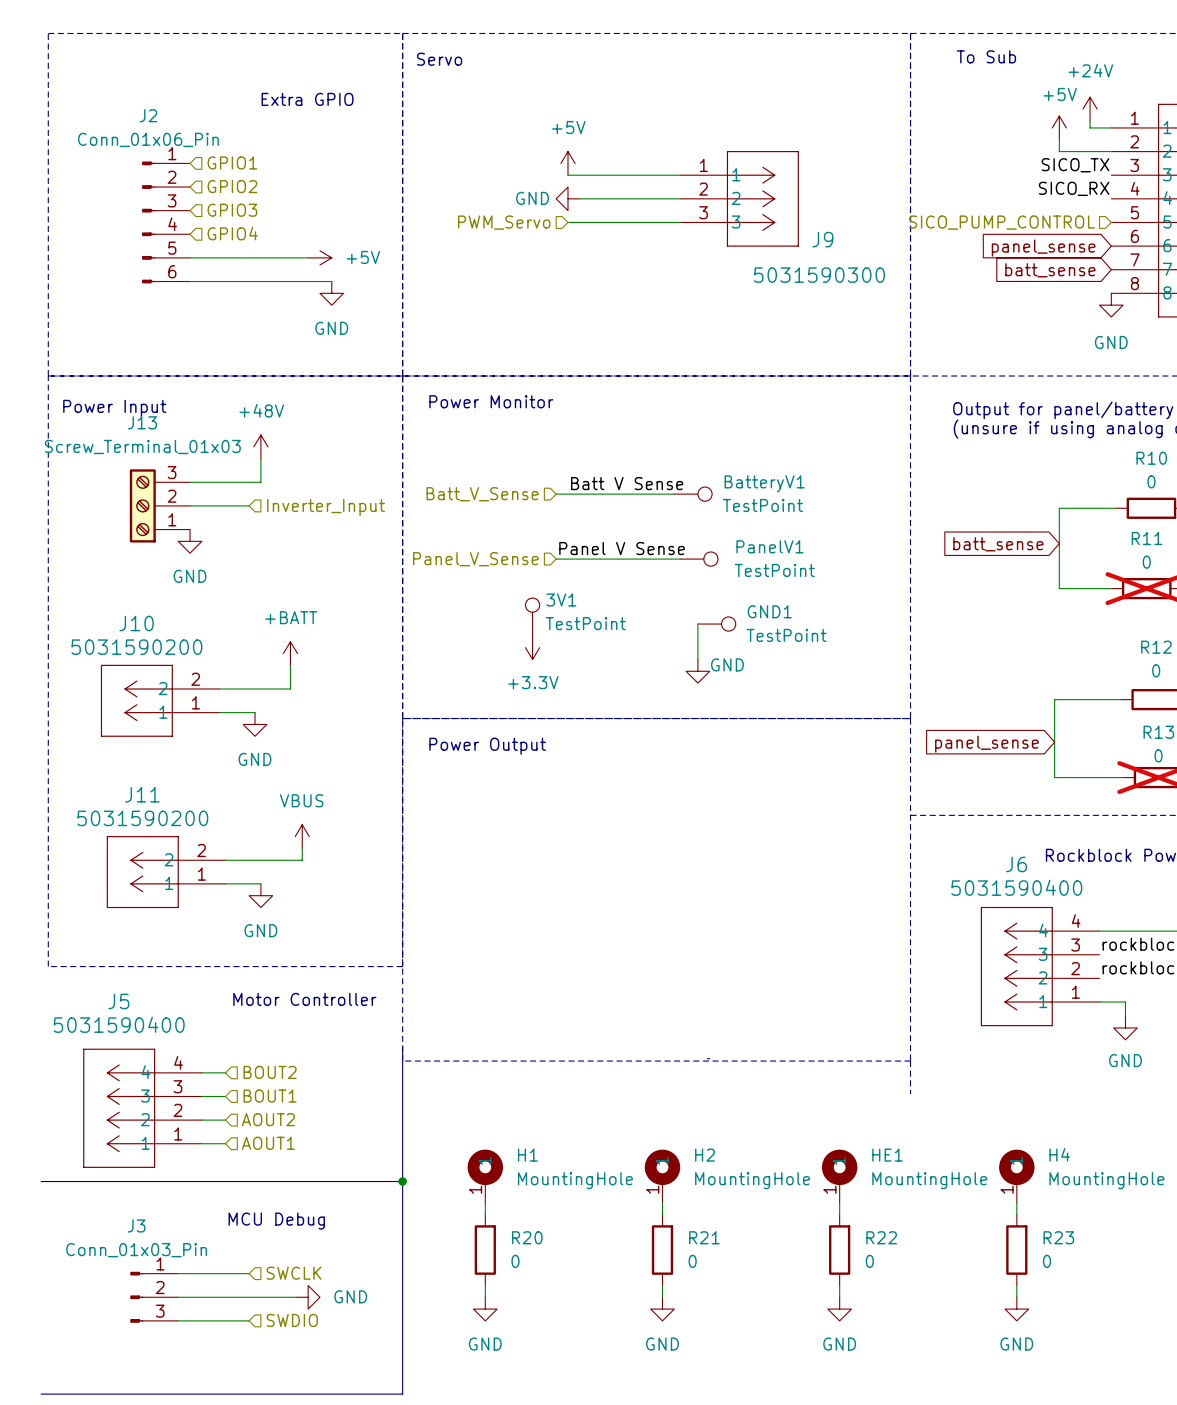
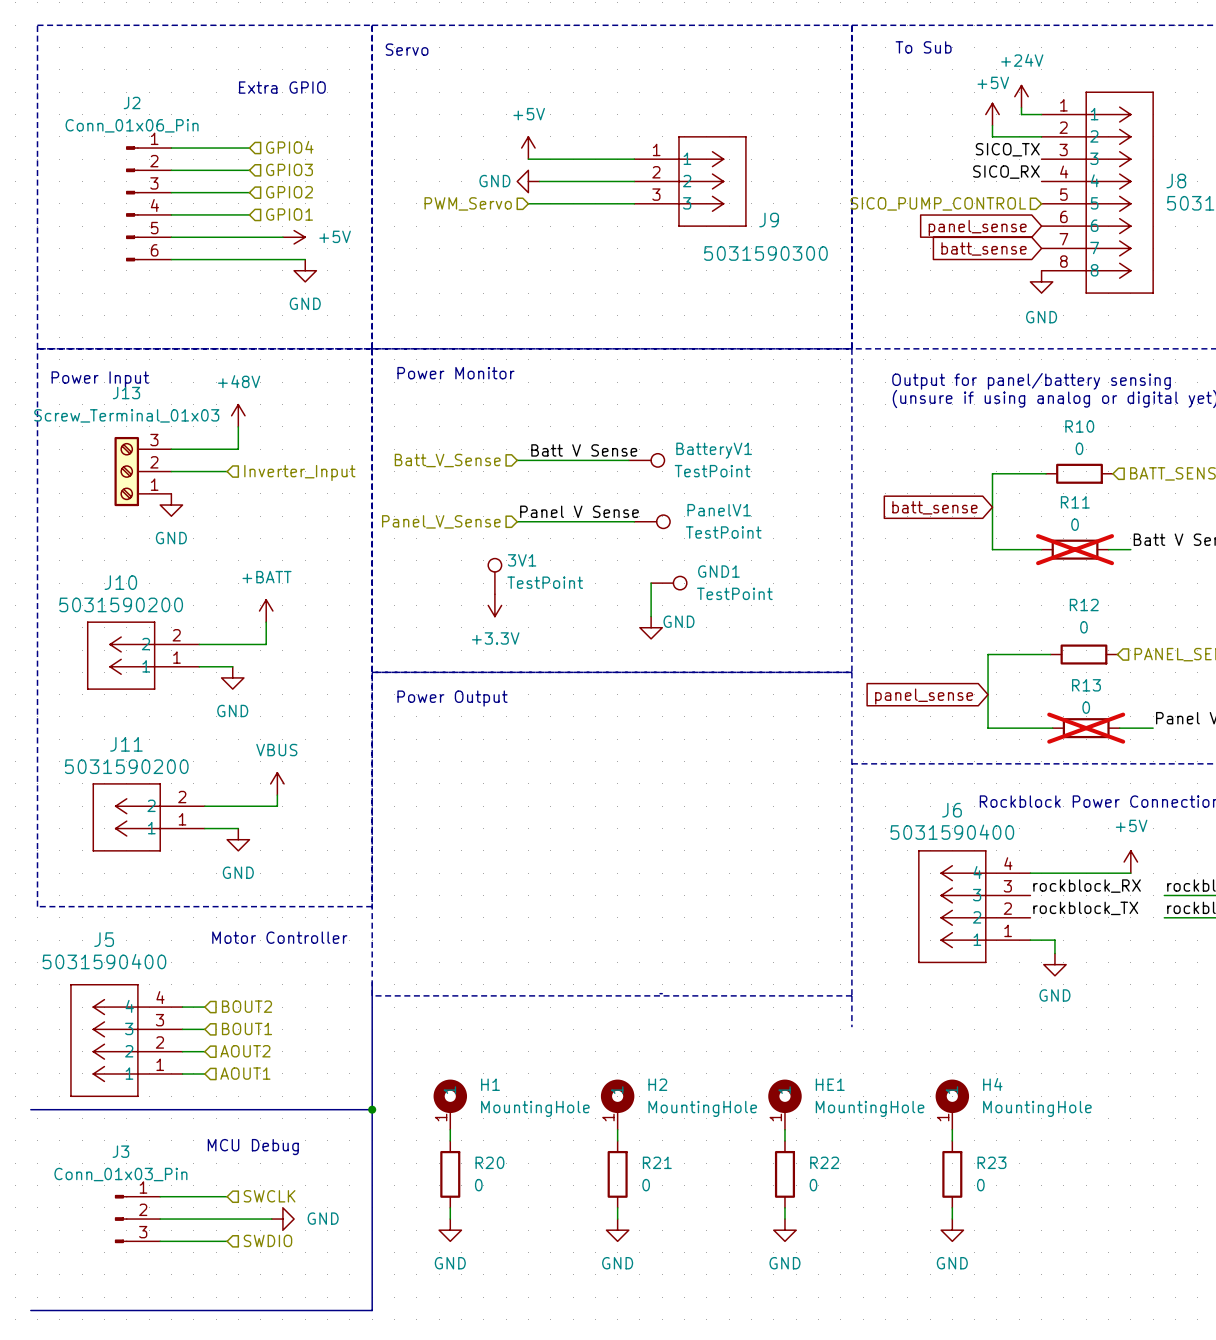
hierarchical label position: GPIO1 (232, 162) -> GPIO1 (289, 214)
wire: none -> (171, 148) (249, 148)
hierarchical label position: GPIO2 (232, 186) -> GPIO2 (289, 192)
wire: none -> (171, 170) (249, 170)
wire: none -> (171, 192) (249, 192)
hierarchical label position: GPIO3 (232, 210) -> GPIO3 (289, 169)
hierarchical label position: GPIO4 (232, 233) -> GPIO4 (289, 147)
wire: none -> (171, 214) (249, 214)

